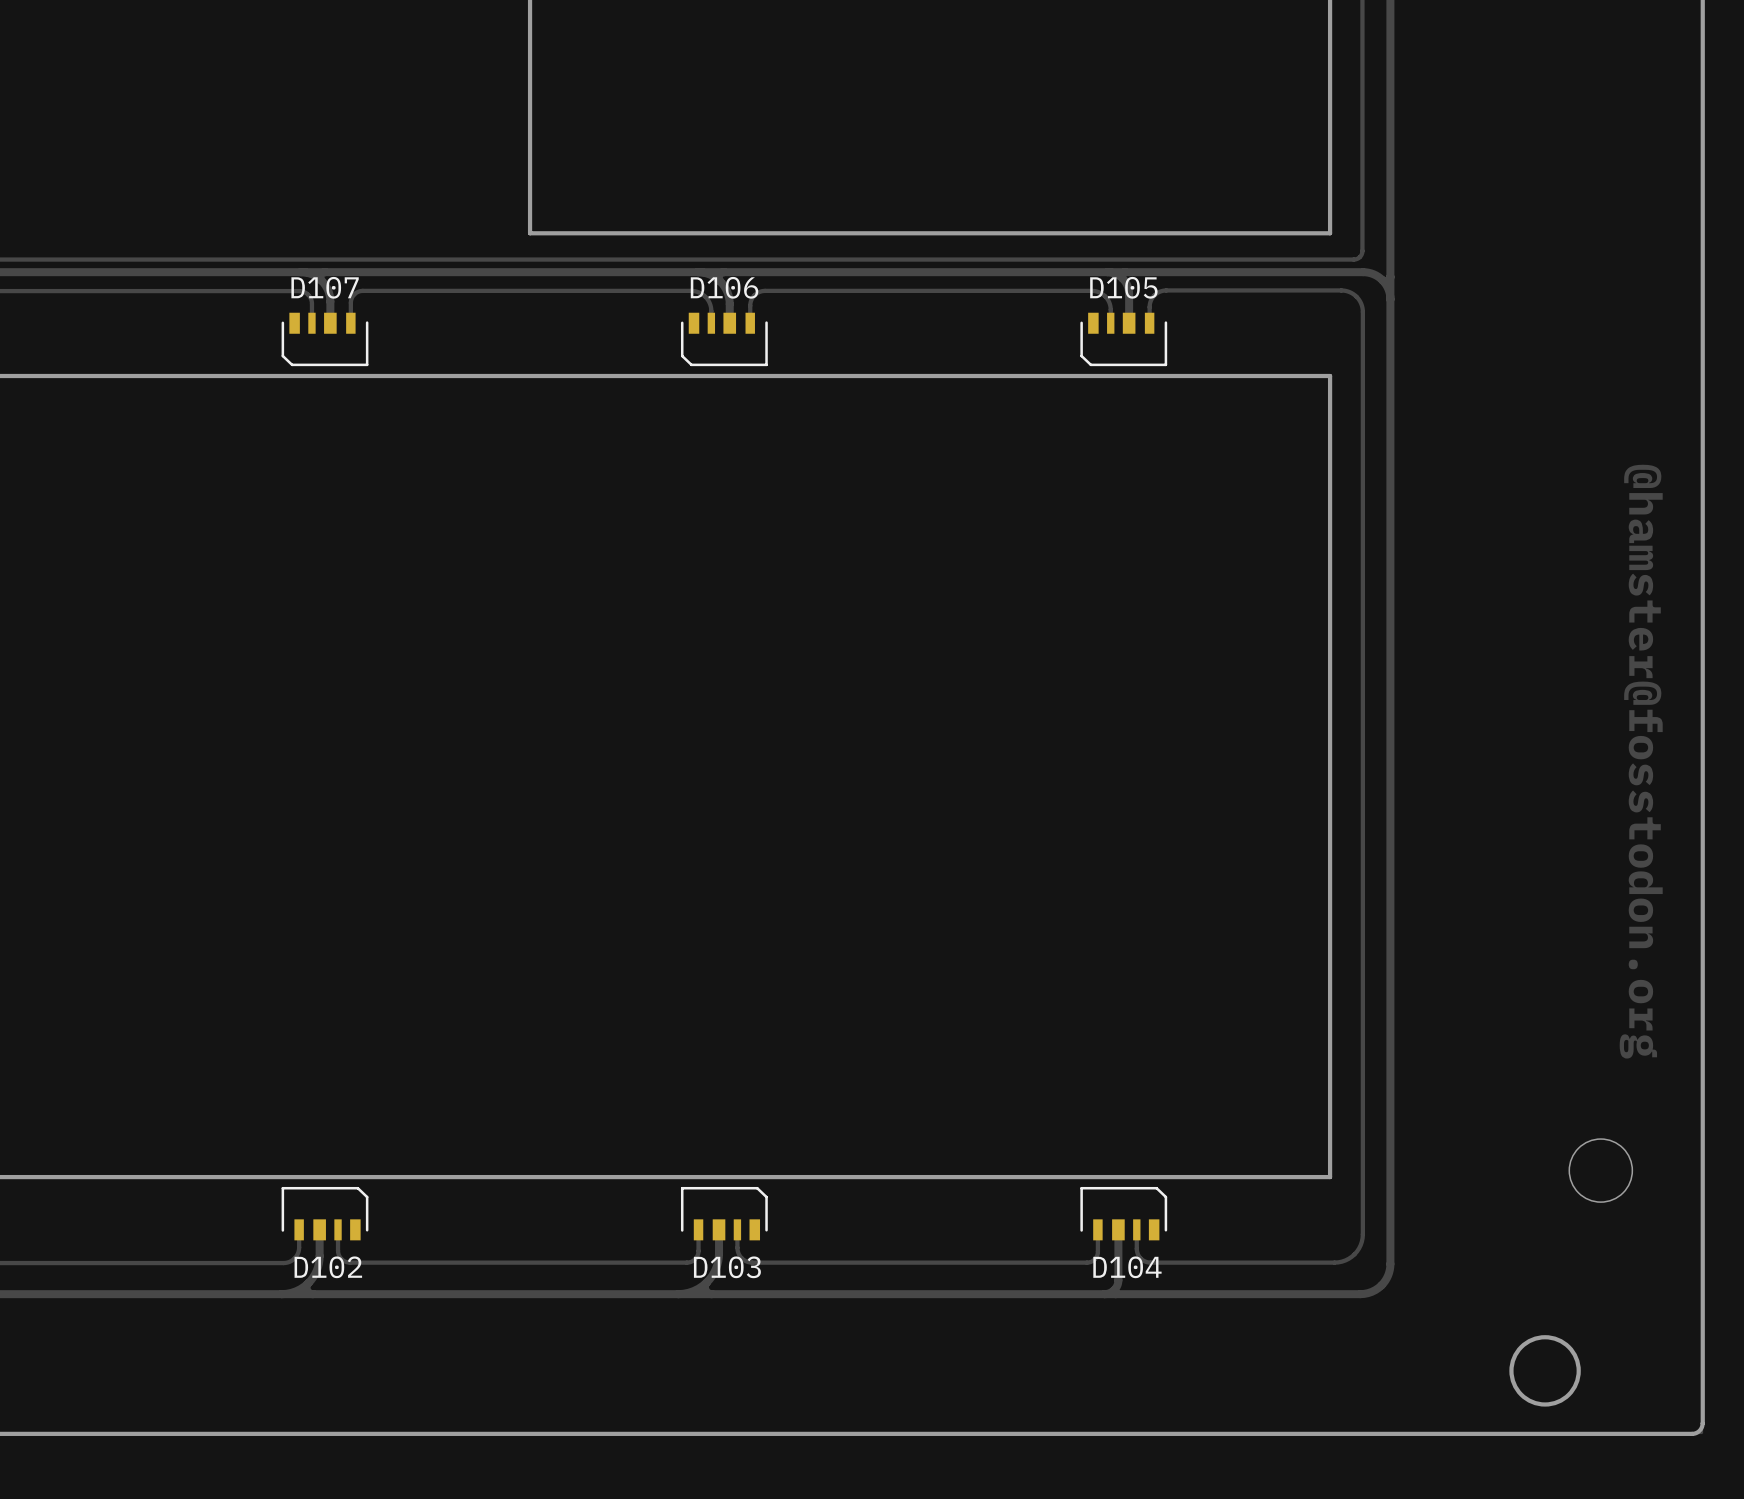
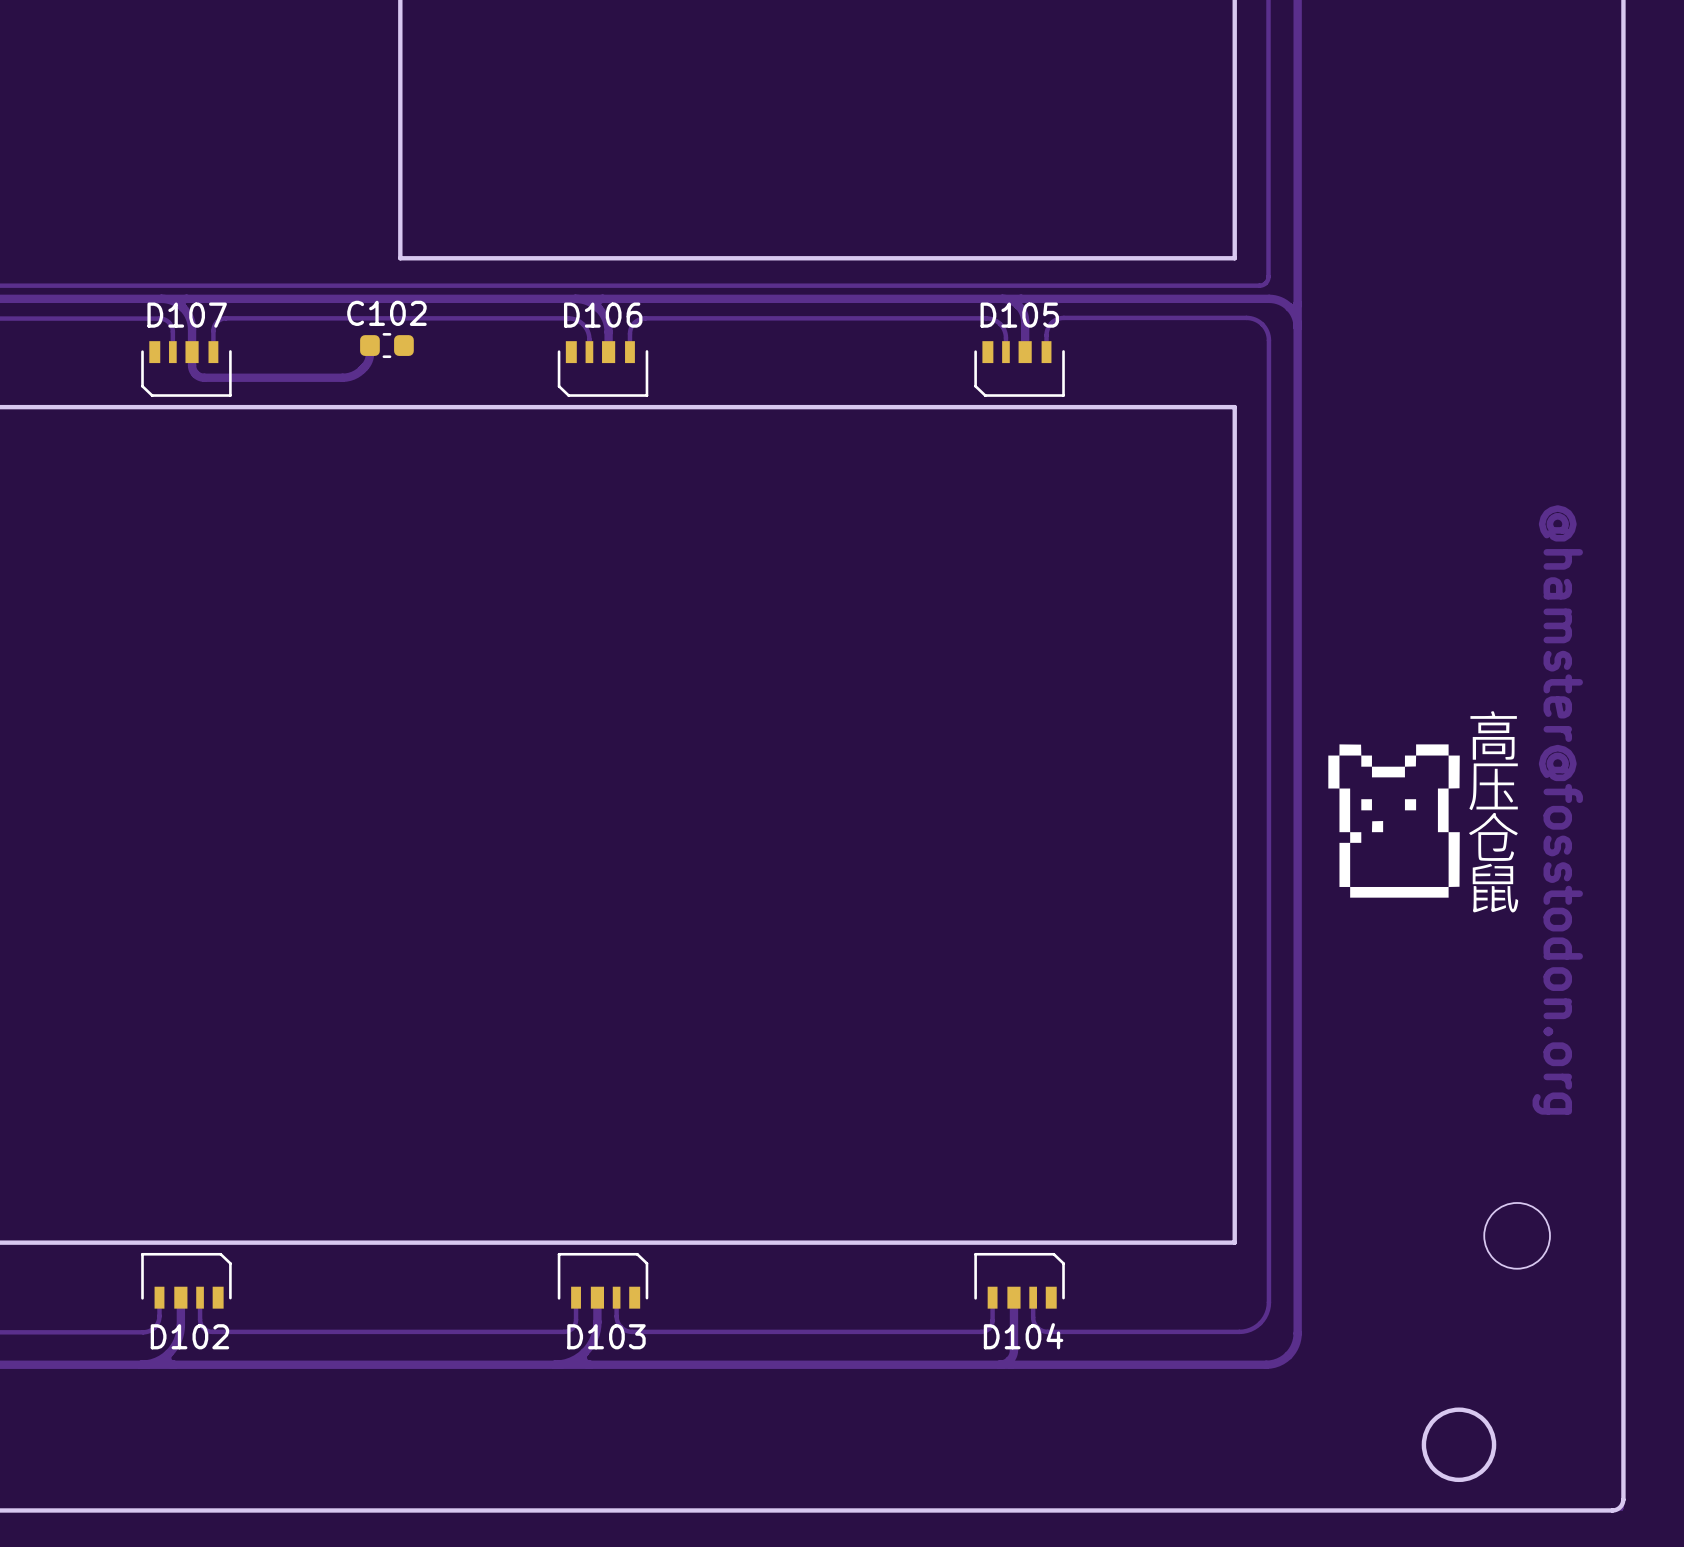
track: none -> (369, 345) (369, 357) (365, 366) (356, 374) (342, 377) (202, 377) (196, 375) (192, 370) (192, 352)
C102: none -> (386, 345)
drawing: none -> [1328, 711, 1519, 913]

